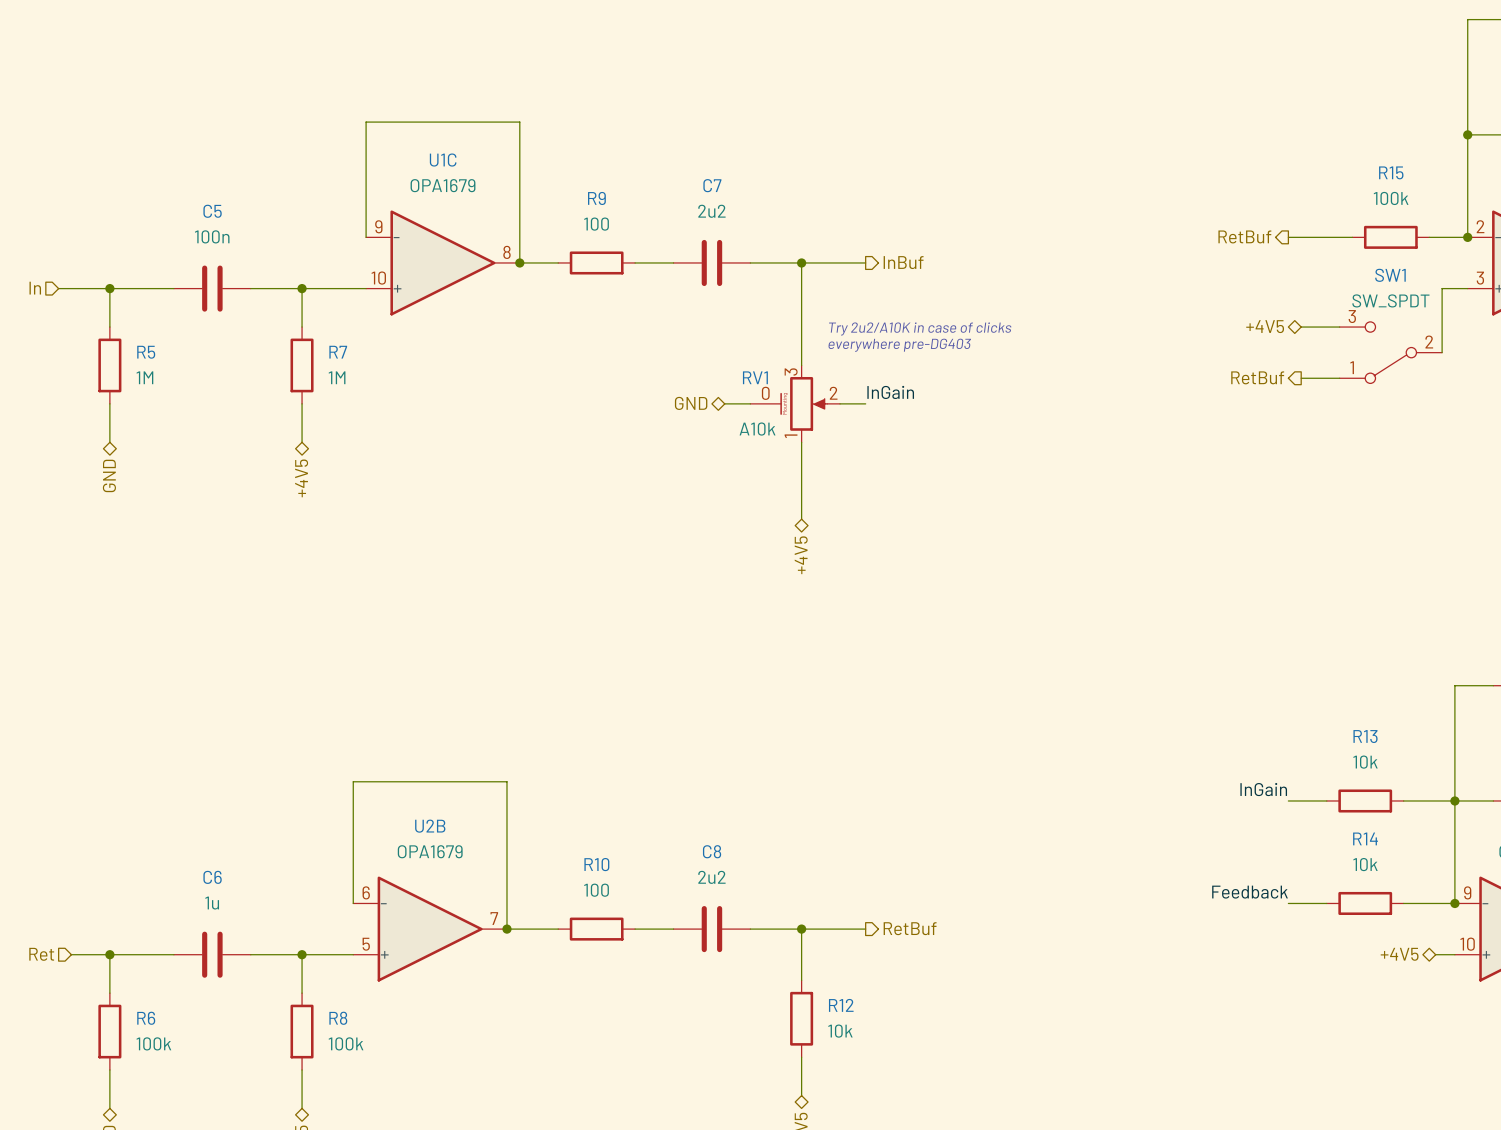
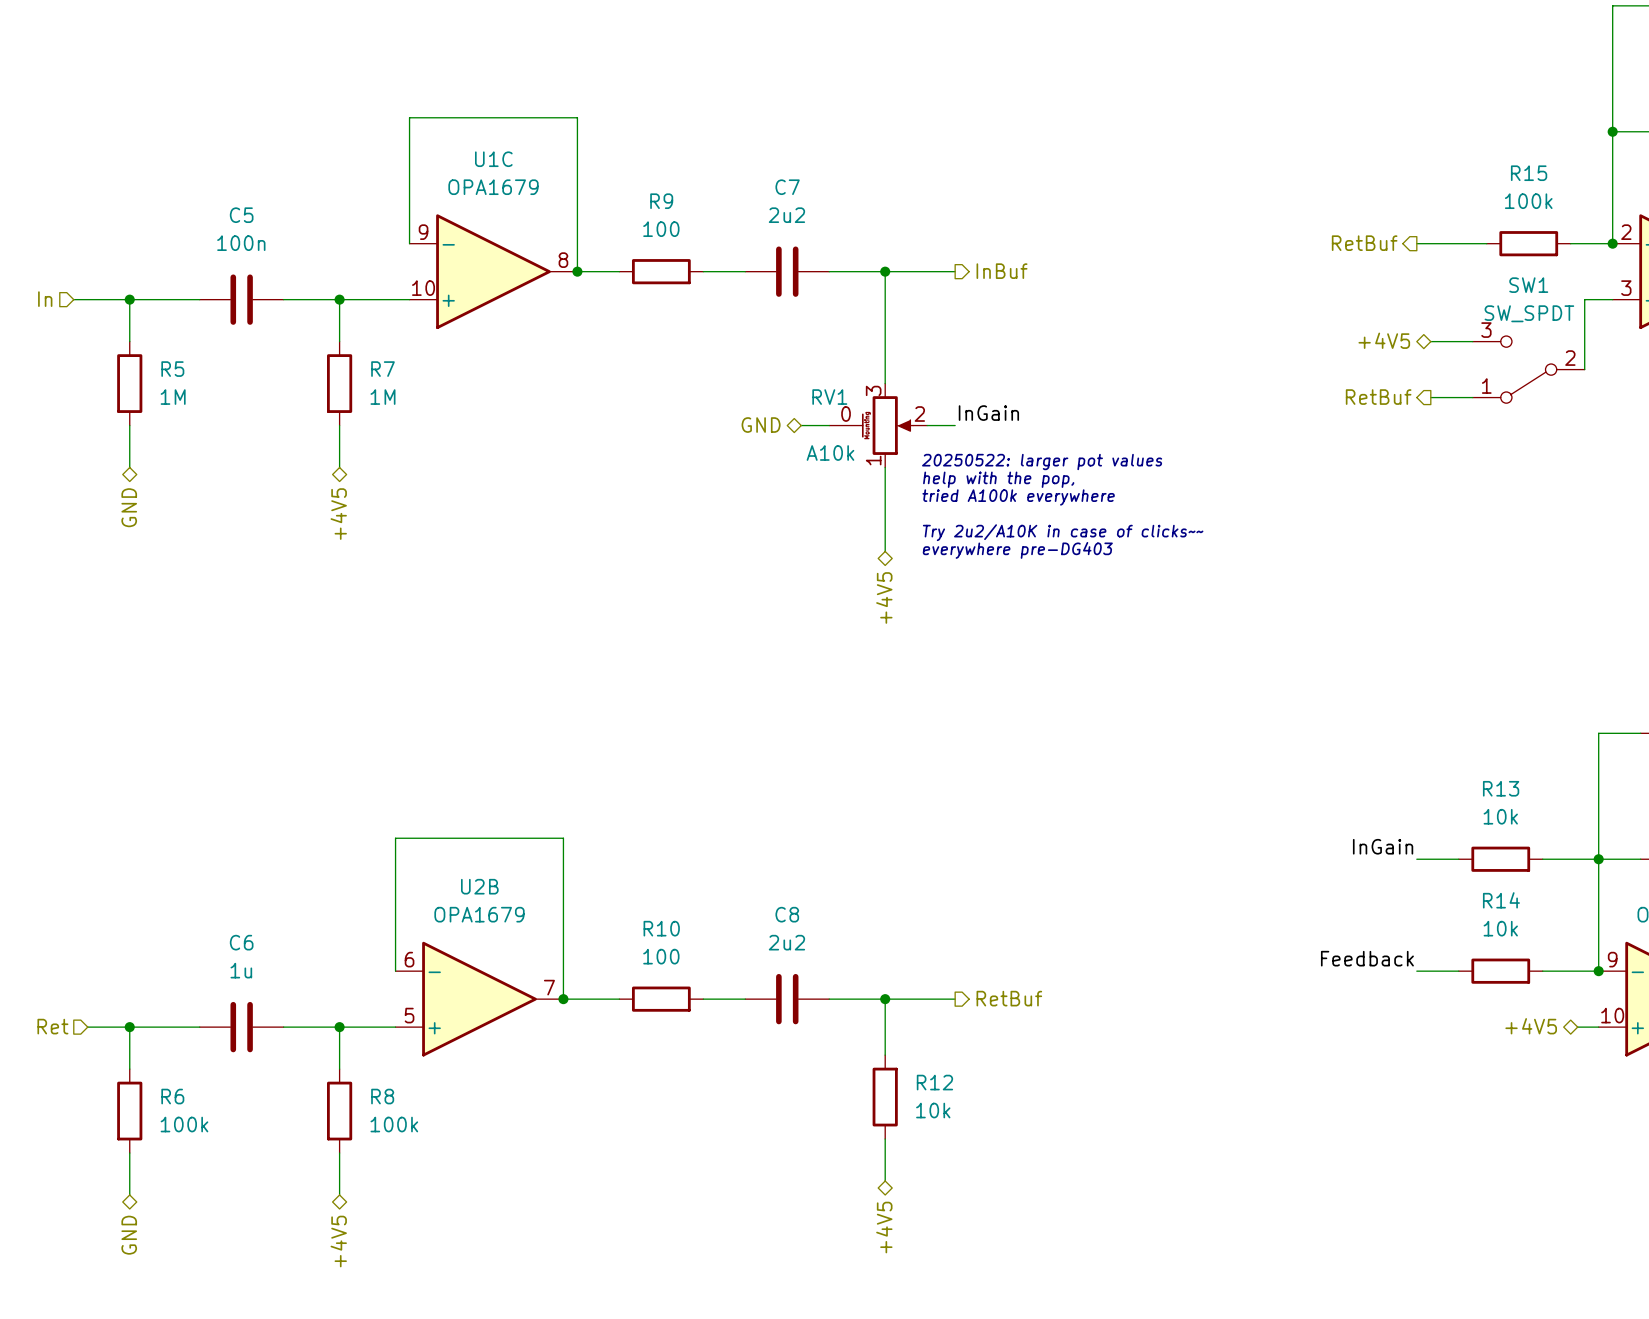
text: Try 2u2/A10K in case of clicks (920, 328) -> none
text position: everywhere pre-DG403 (899, 345) -> everywhere pre-DG403 (1017, 550)
text: none -> 20250522: larger pot values (1042, 462)
text: none -> help with the pop, (998, 479)
text: none -> tried A100k everywhere (1018, 497)
text: none -> Try 2u2/A10K in case of clicks~~ (1063, 532)

